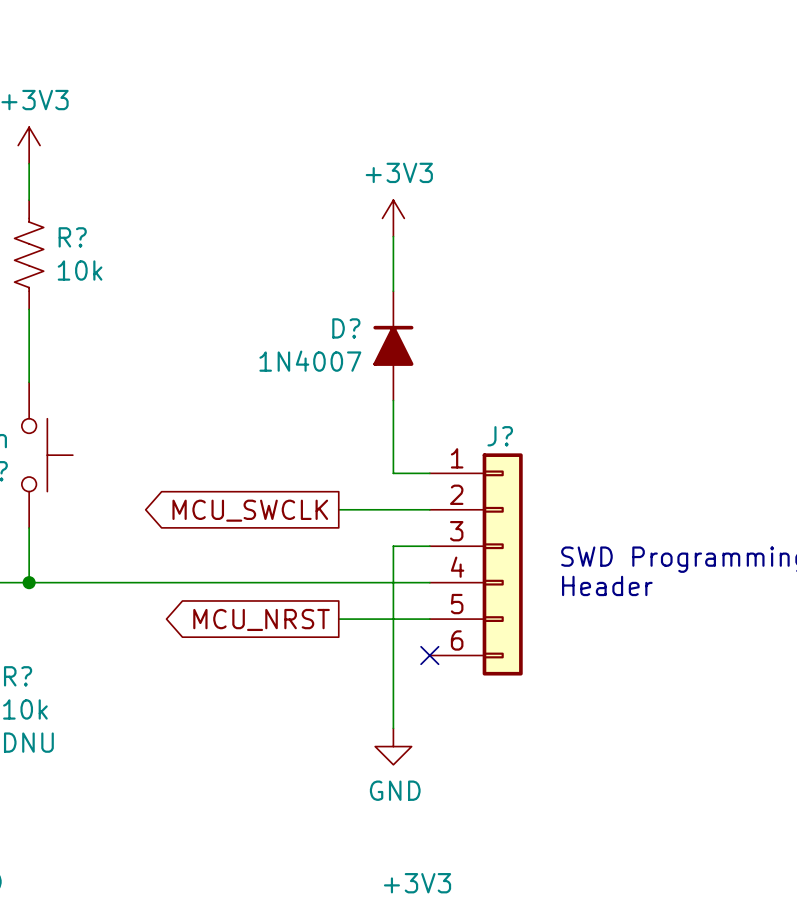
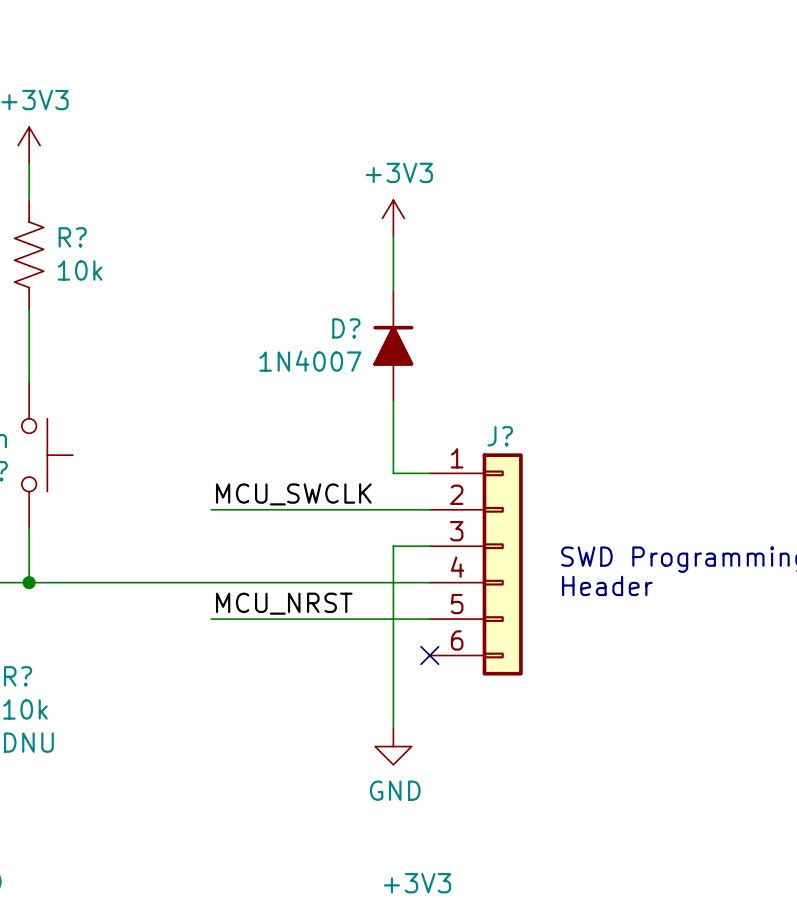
label: none -> MCU_SWCLK (293, 494)
wire: none -> (211, 509) (338, 509)
global label: MCU_SWCLK (250, 510) -> none
label: none -> MCU_NRST (284, 603)
wire: none -> (211, 619) (338, 619)
global label: MCU_NRST (261, 619) -> none

